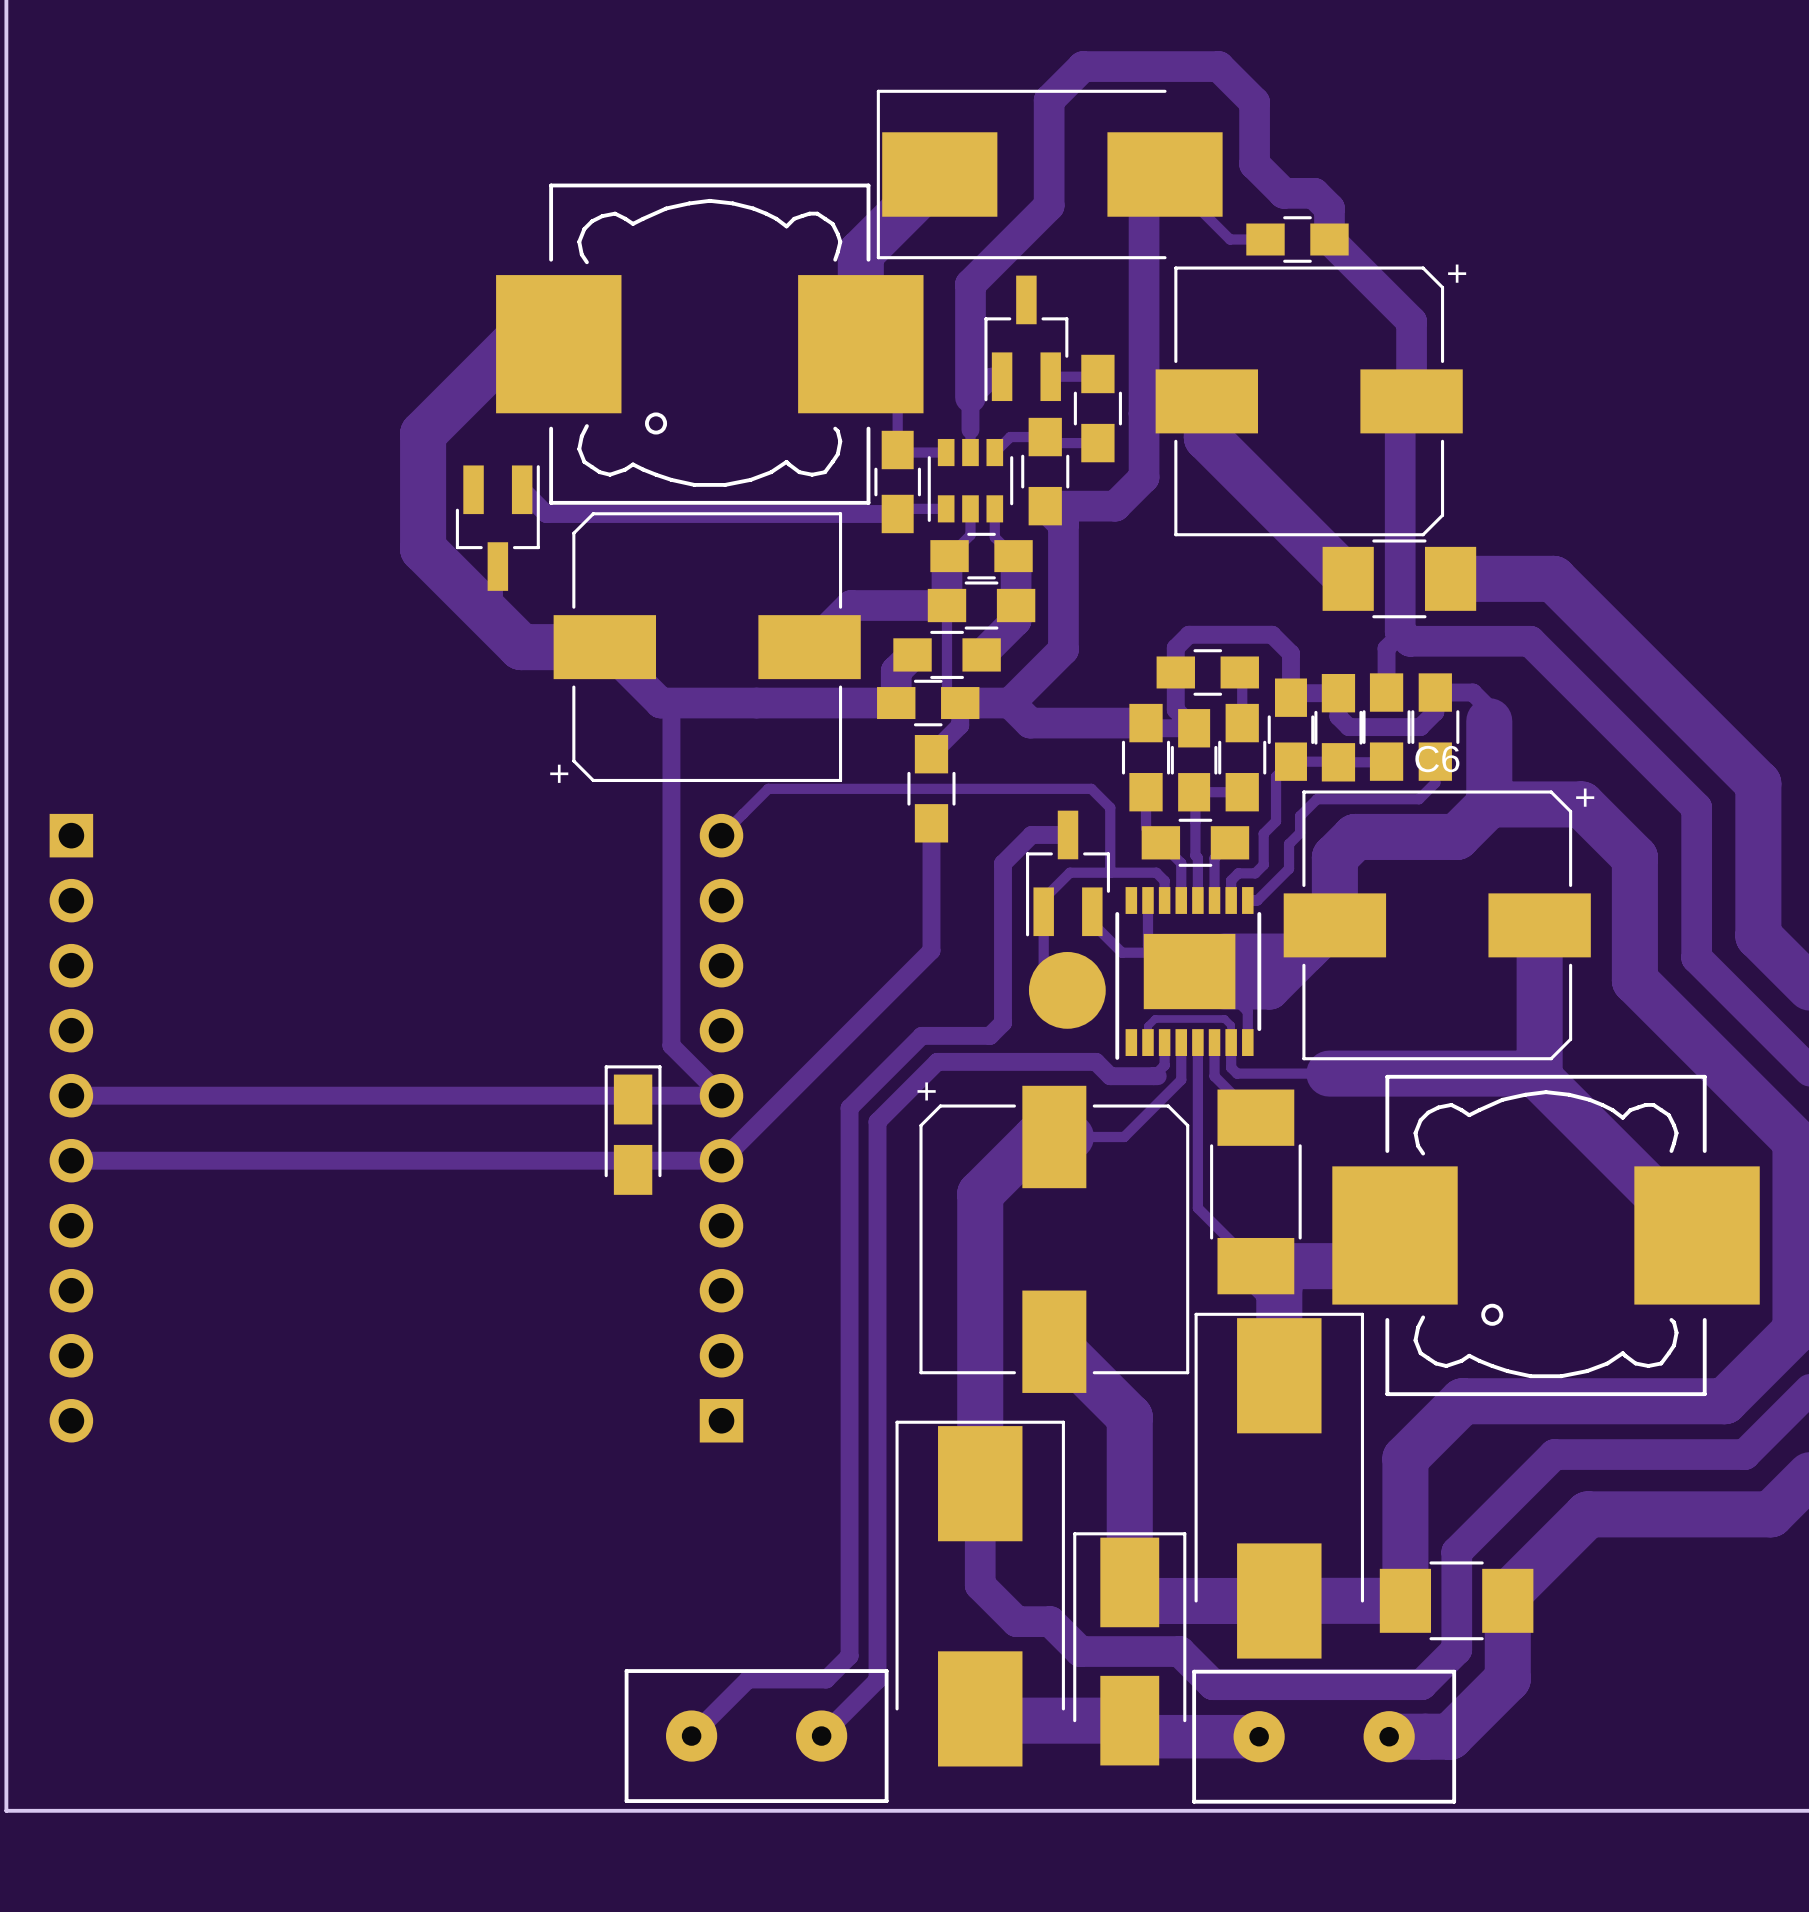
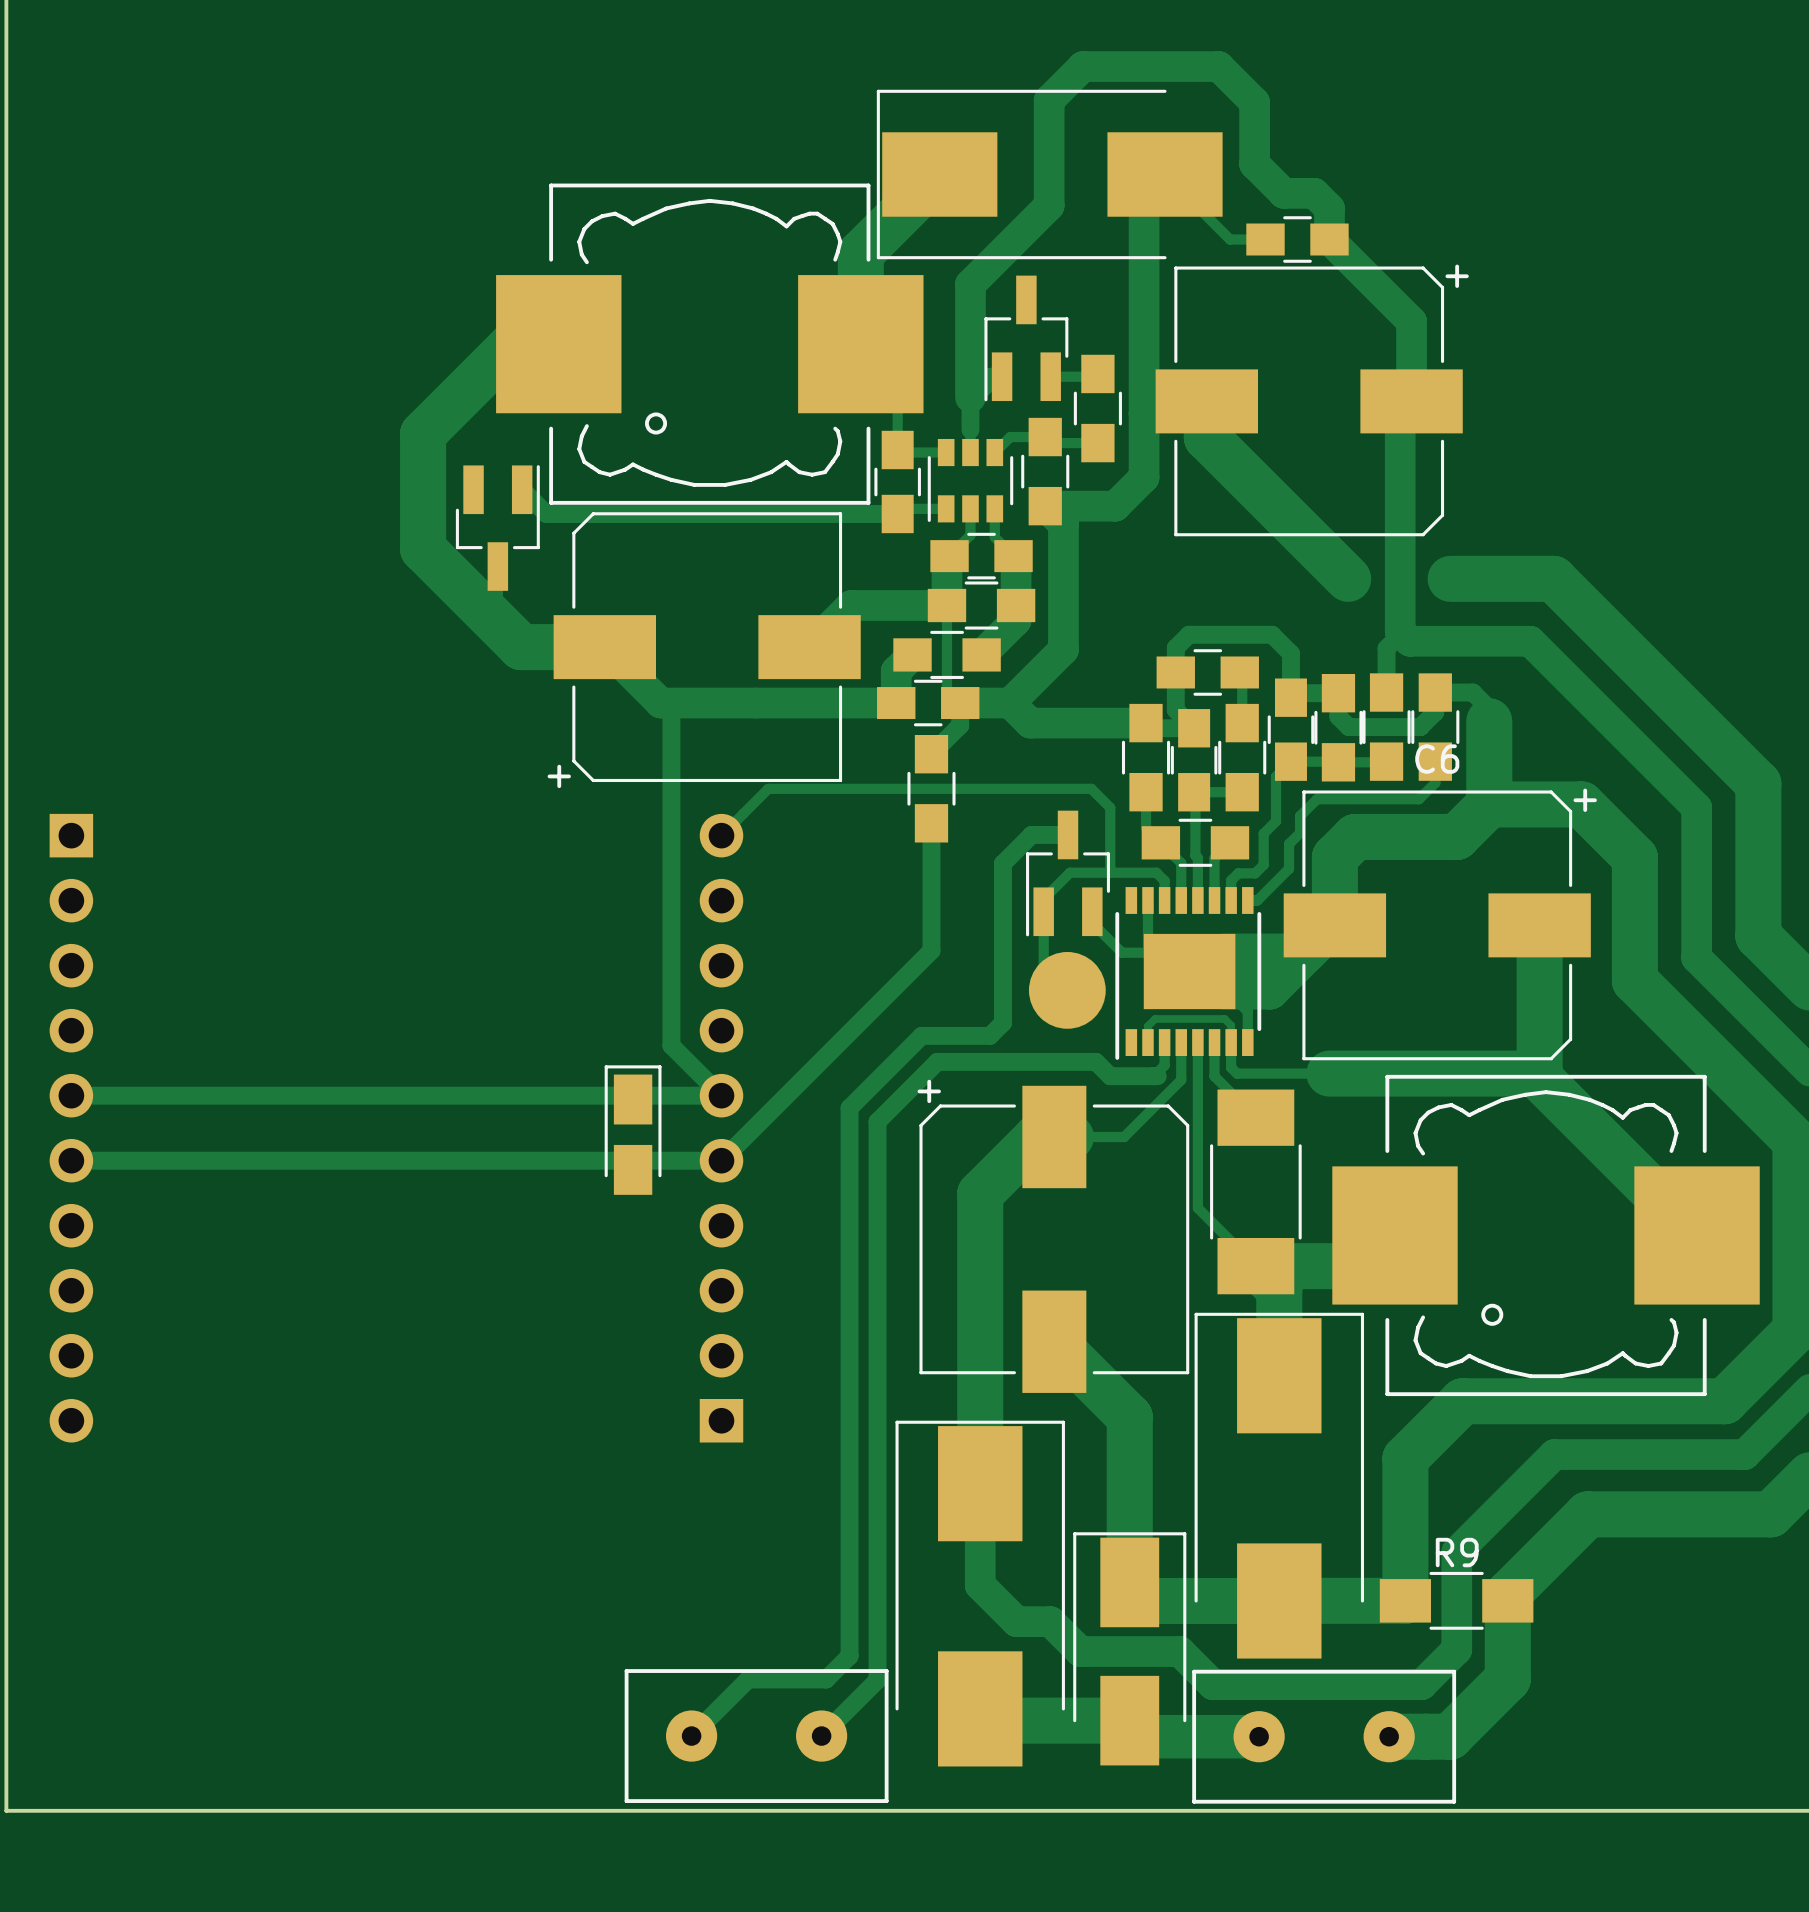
part: (1399, 578) -> none
part: (1456, 1600) -> none
R9: none -> (1456, 1600)

